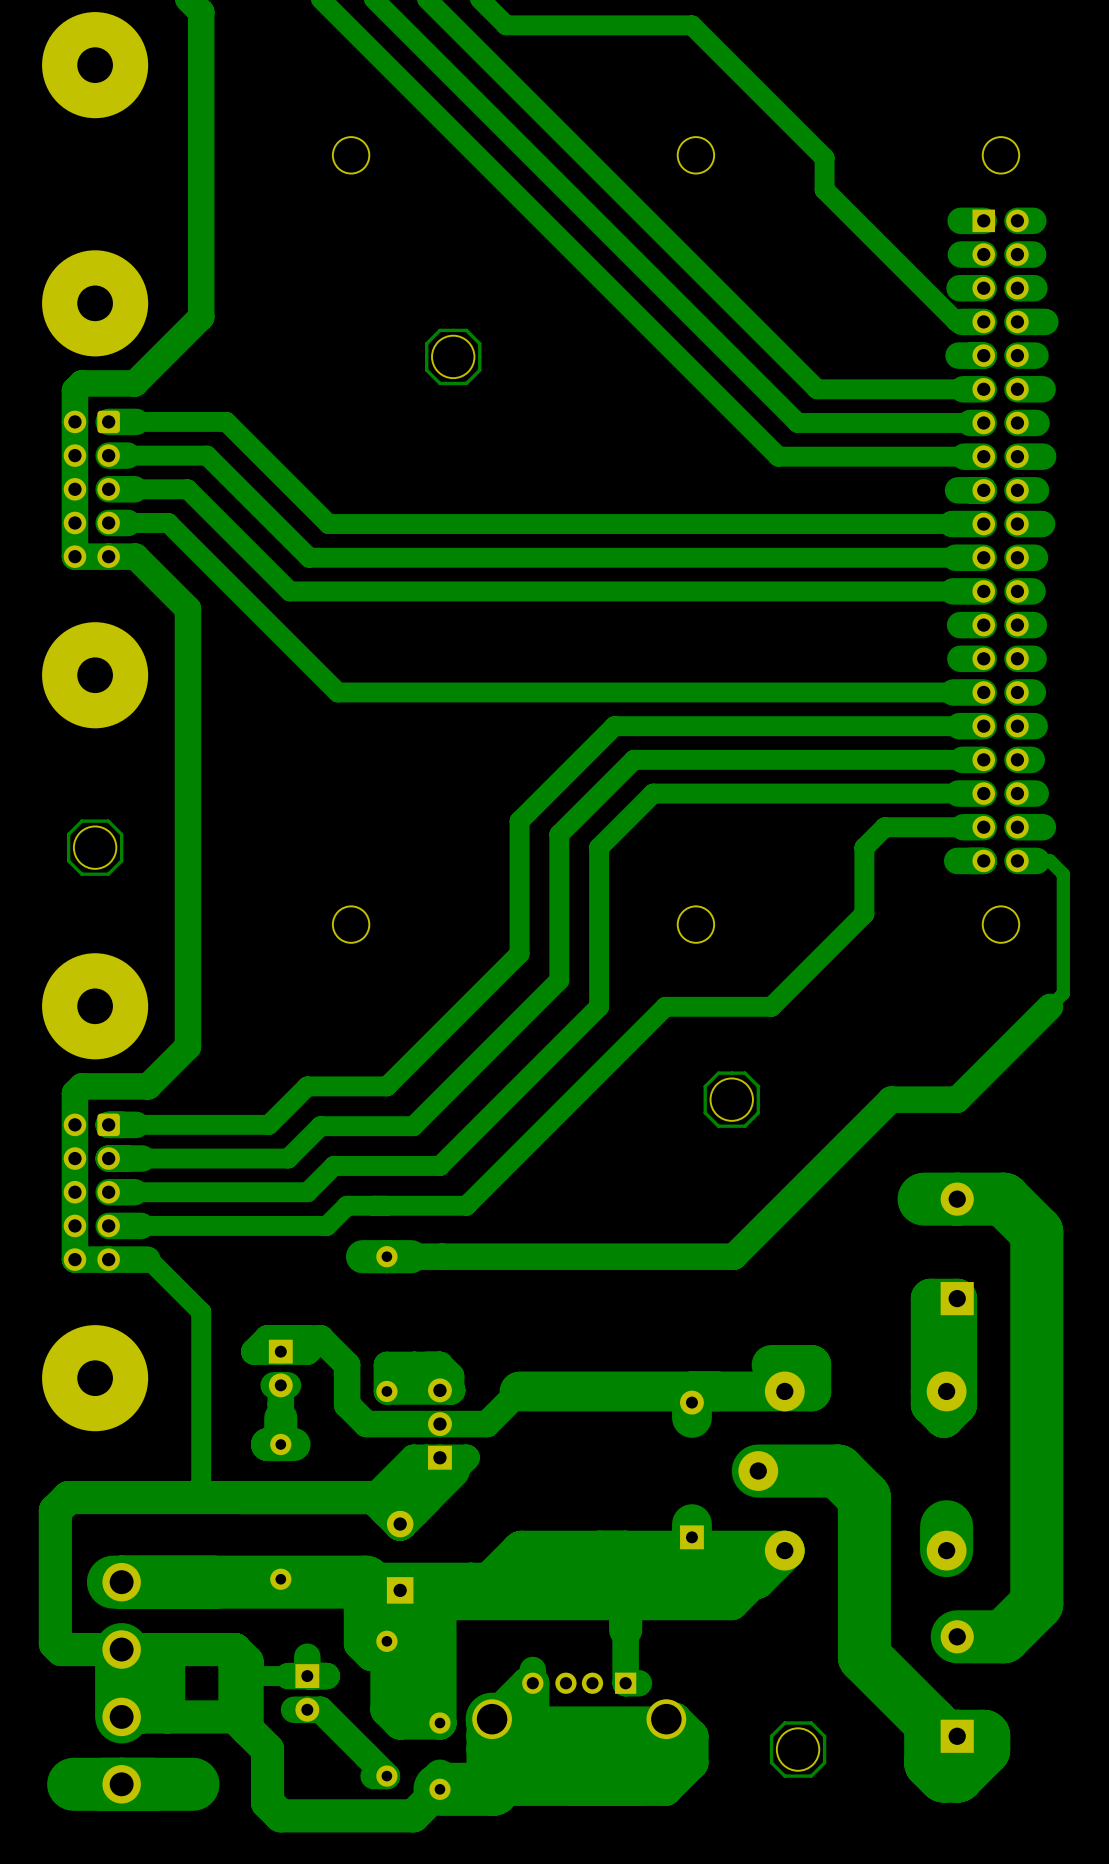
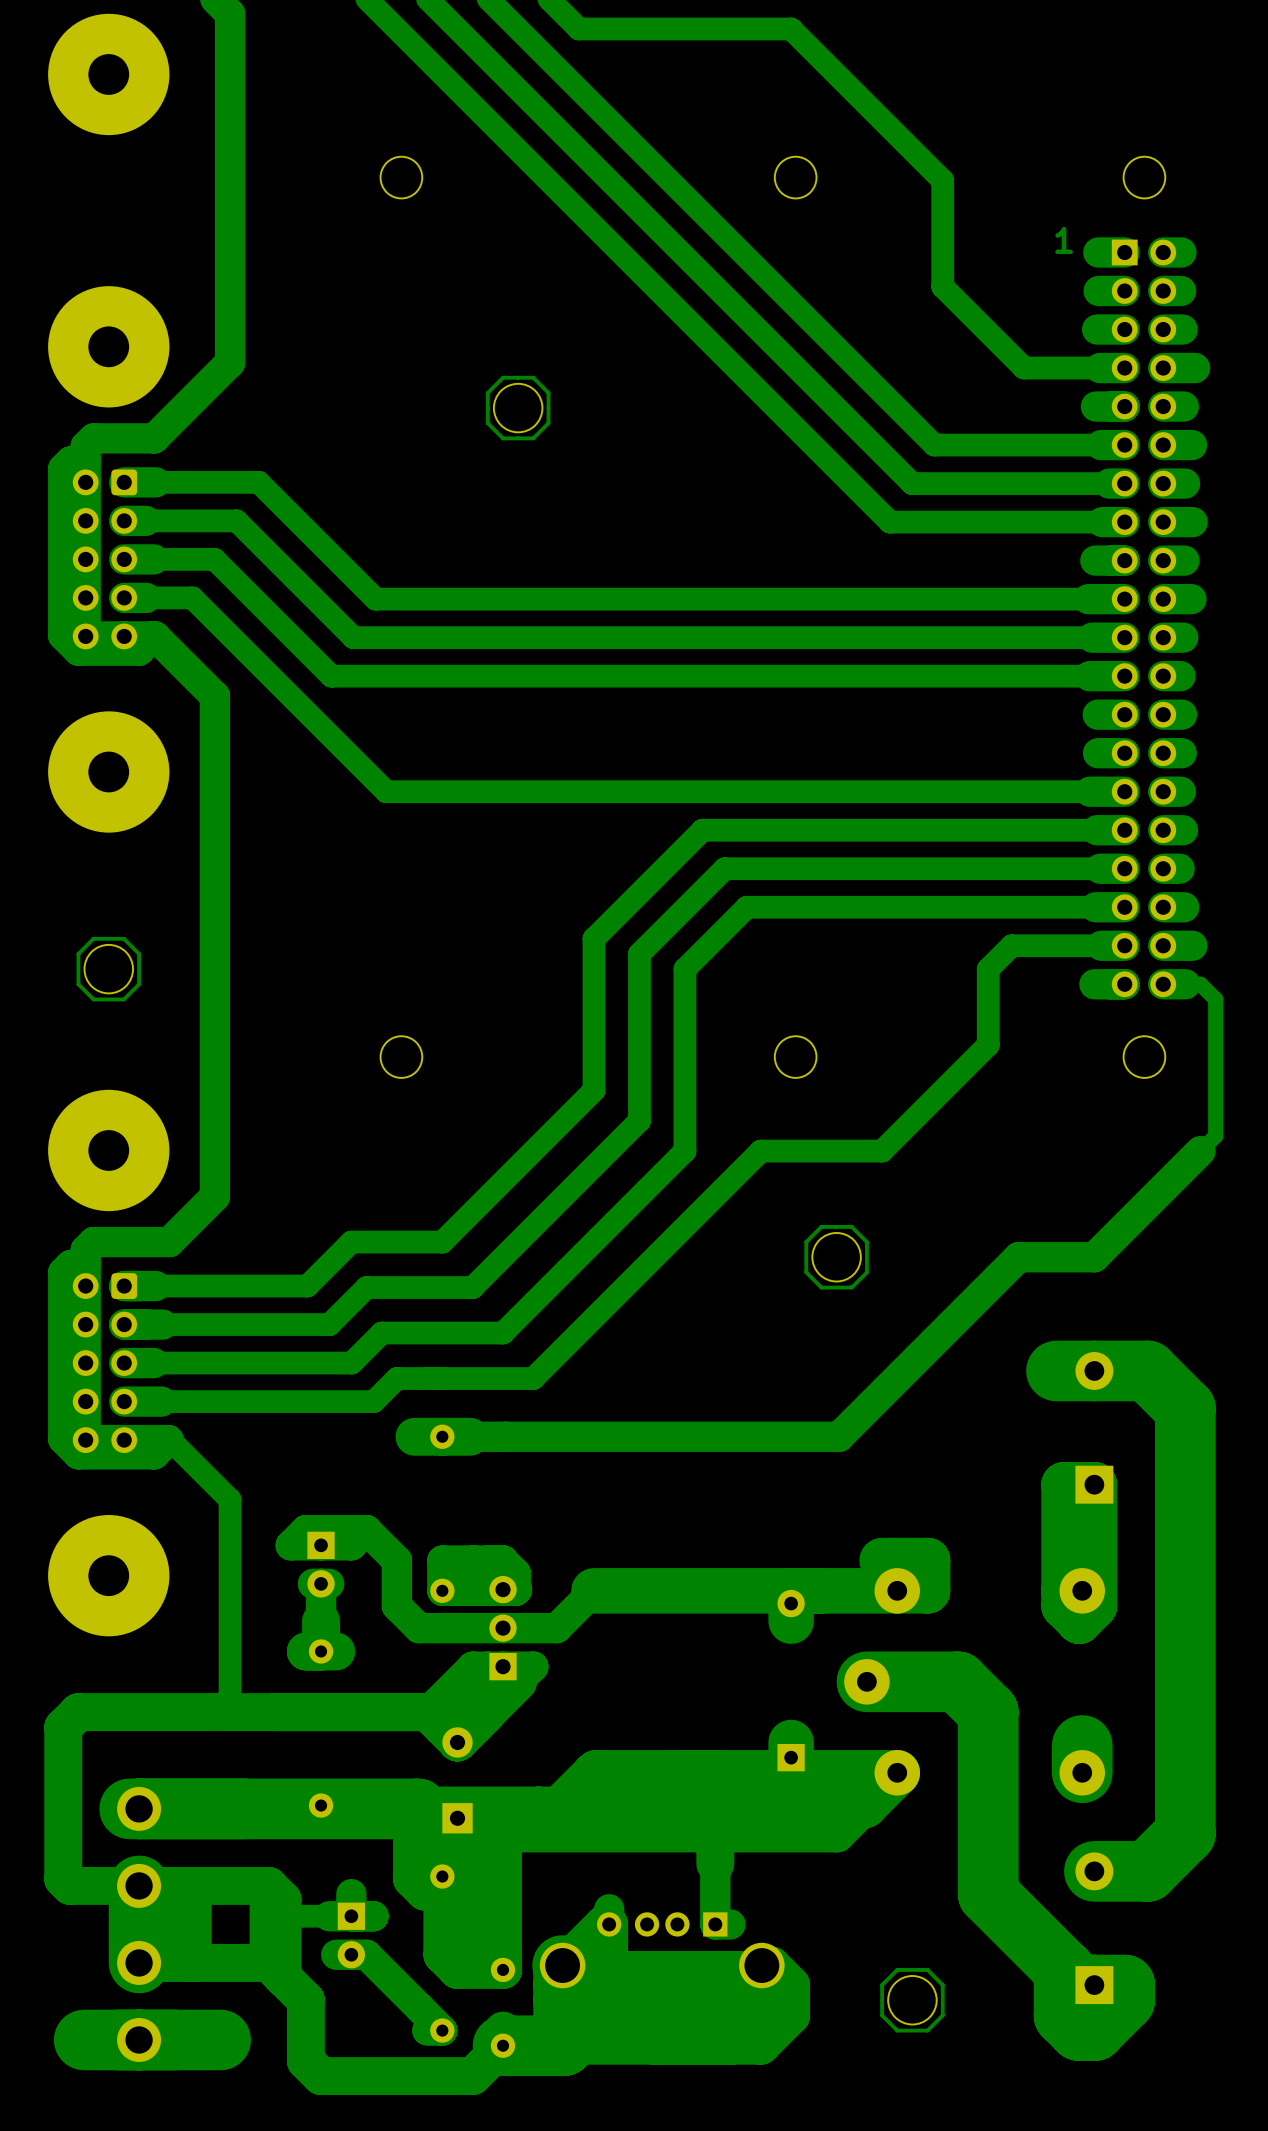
track: (824, 189) (956, 321) -> (942, 216) (942, 286) (1024, 368) (1093, 368)
text: none -> 1 (1064, 240)
track: none -> (85, 461) (70, 461) (63, 468) (63, 635) (78, 650) (139, 650) (153, 636)
track: none -> (85, 1265) (70, 1265) (63, 1272) (63, 1439) (78, 1454) (154, 1454) (168, 1440)

